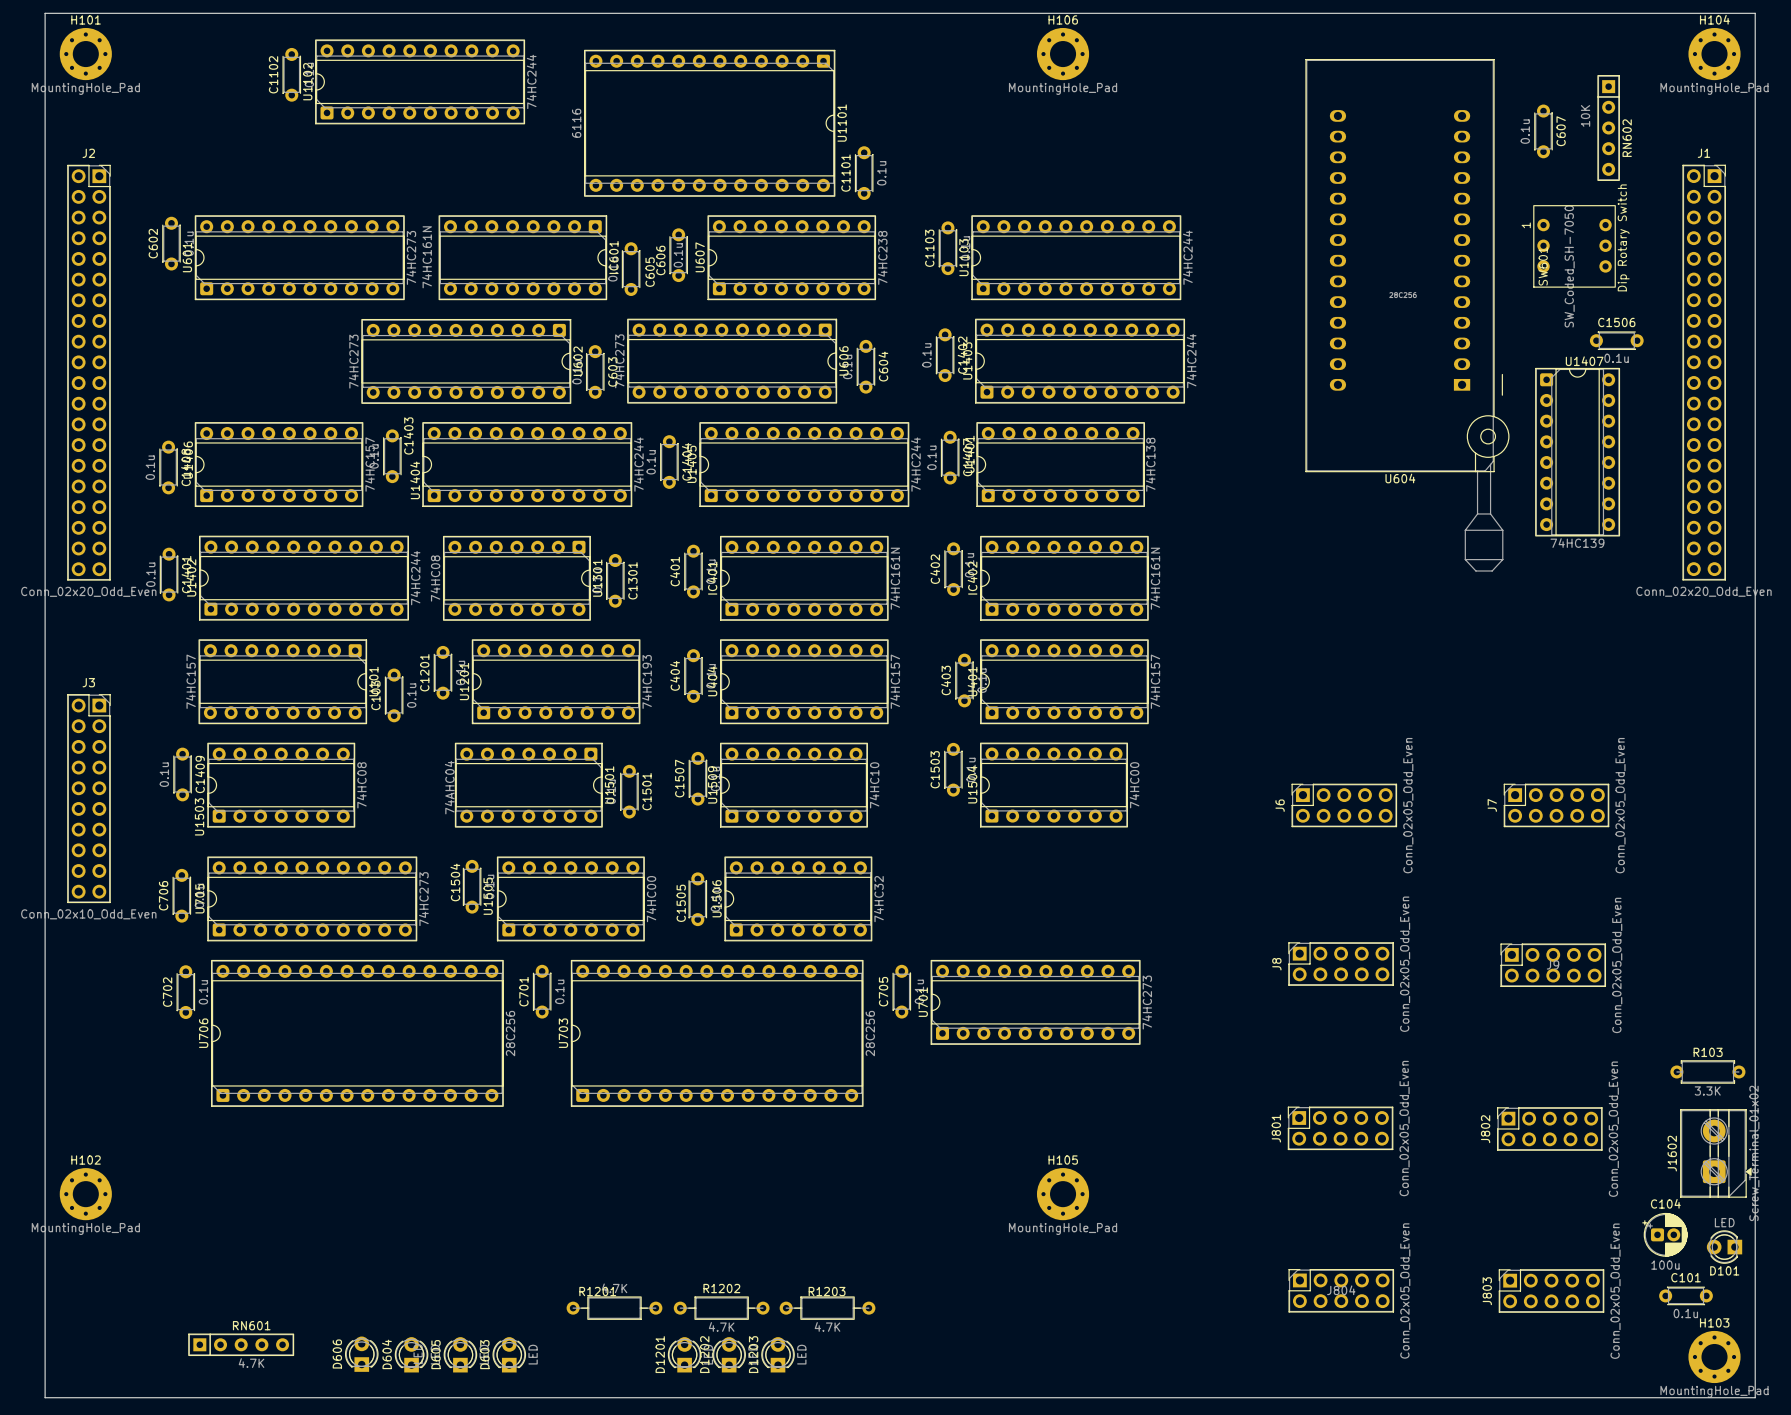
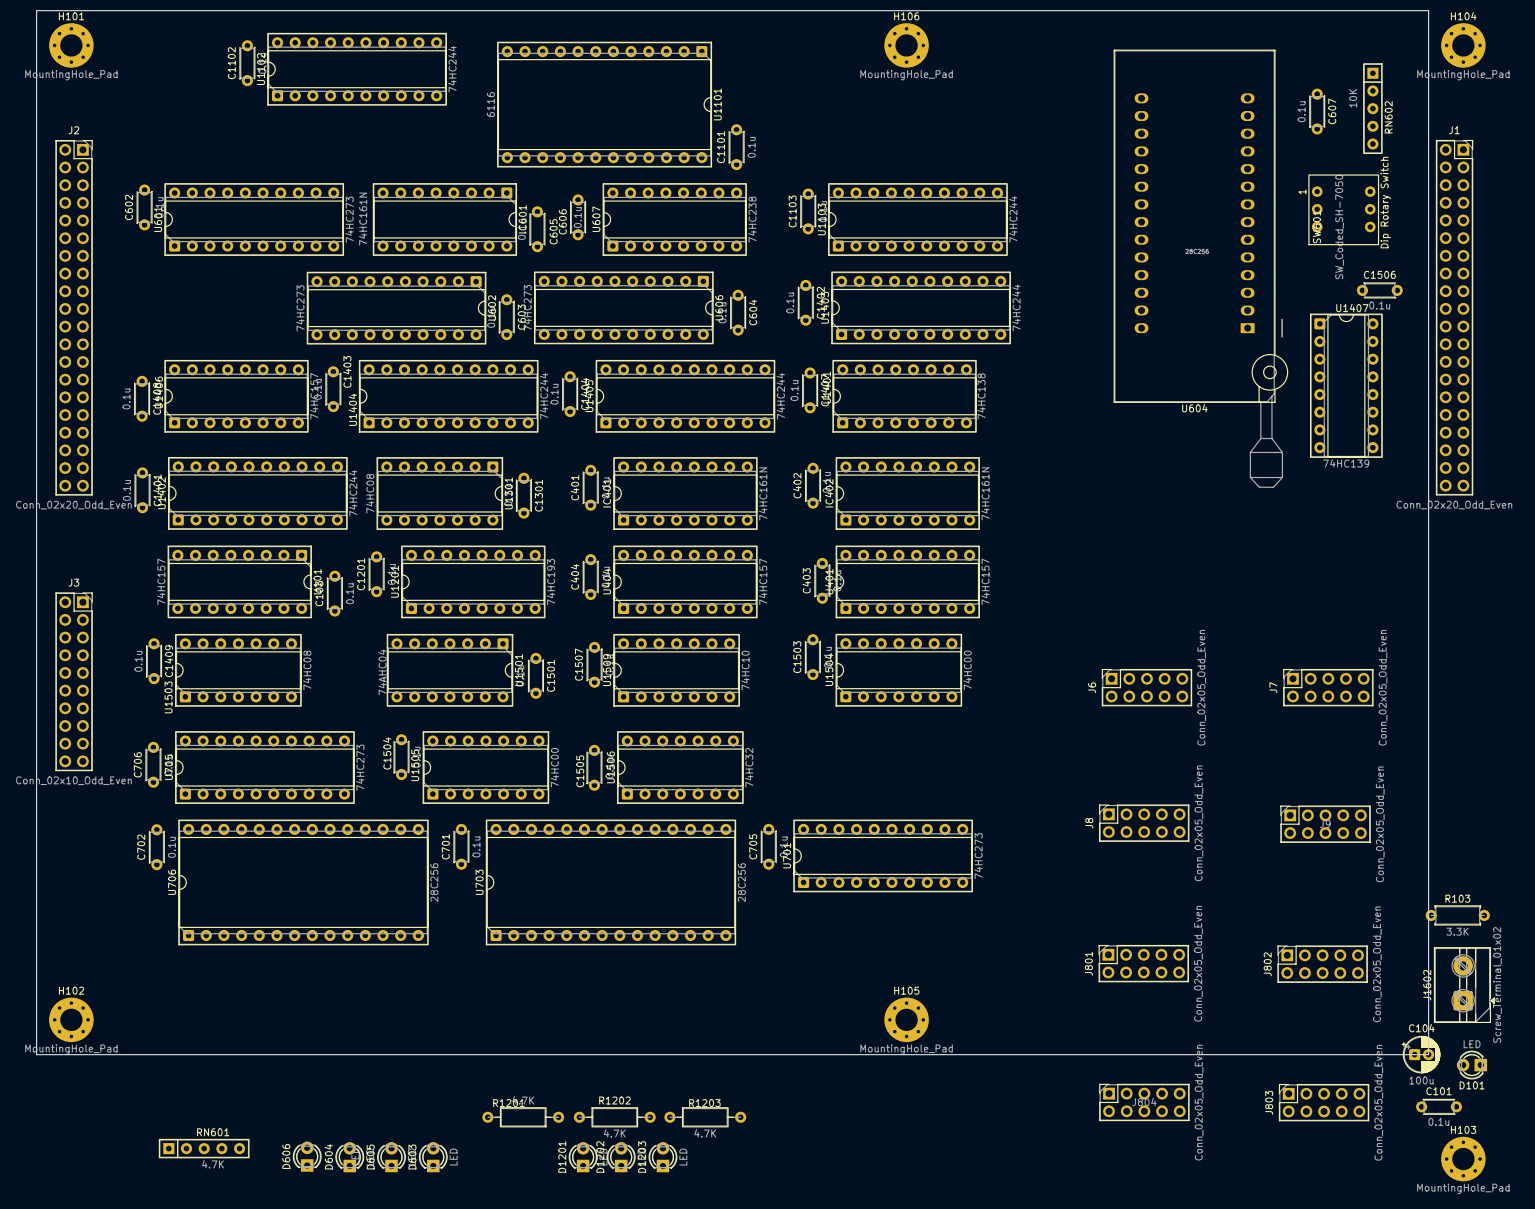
board edge: (1673, 13) (1755, 13) (1755, 1397) (45, 1397) (45, 1234) -> (1428, 10) (1428, 1054) (36, 1054)

